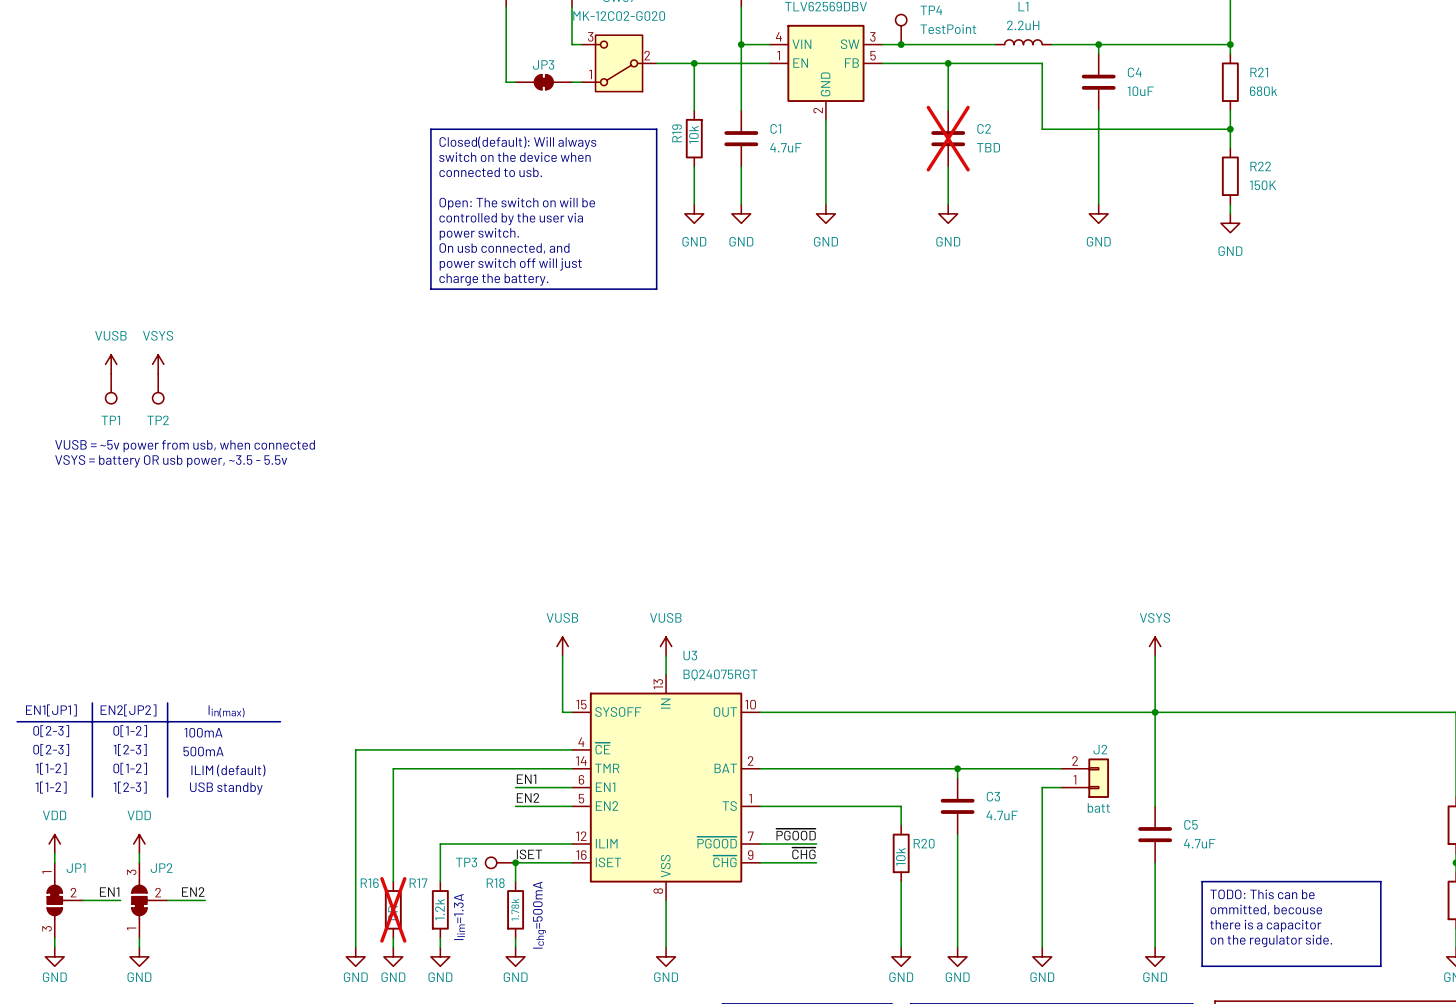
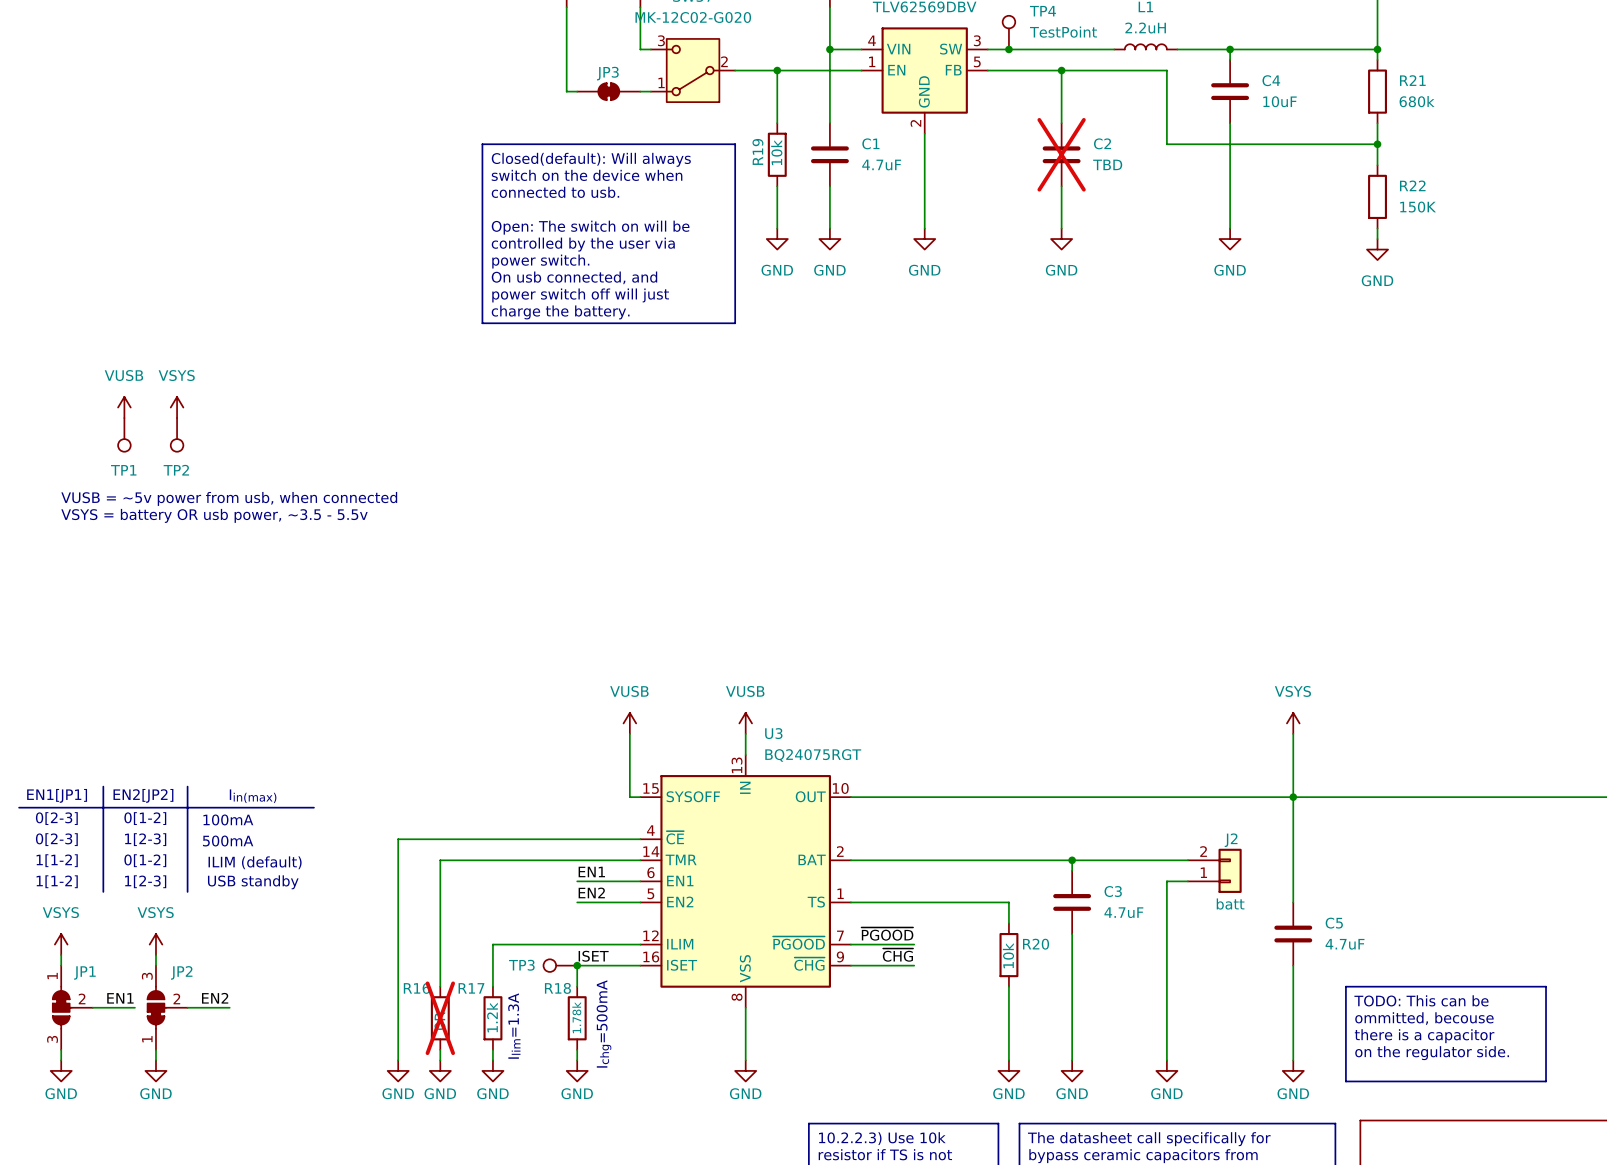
power symbol: VDD (54, 844) -> VSYS (61, 944)
power symbol: VDD (139, 844) -> VSYS (155, 944)

